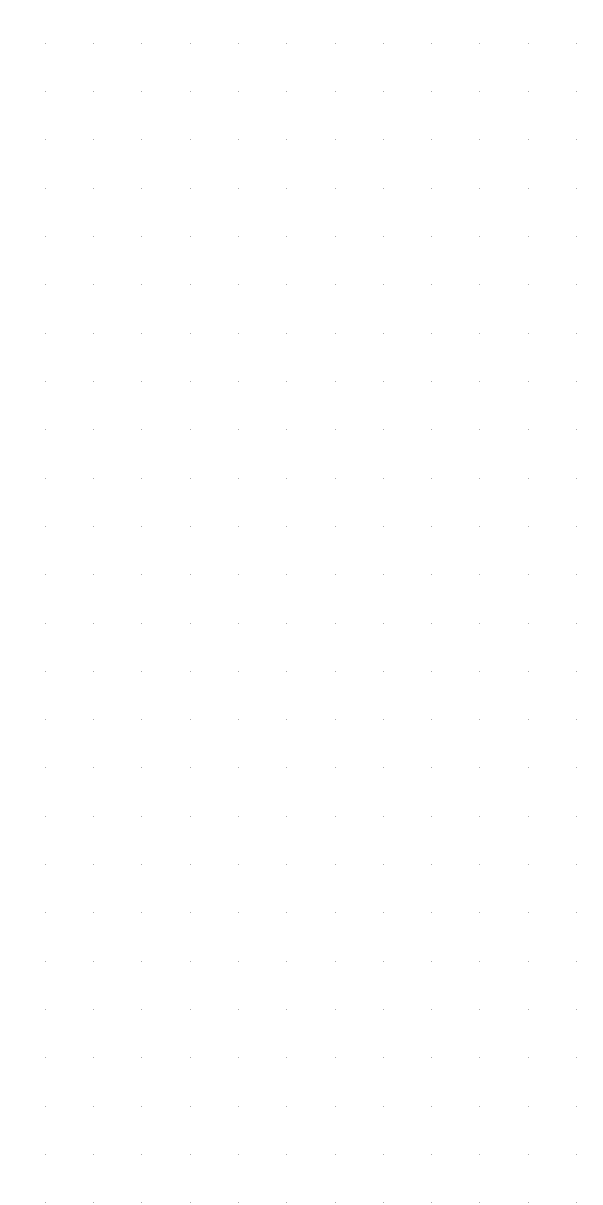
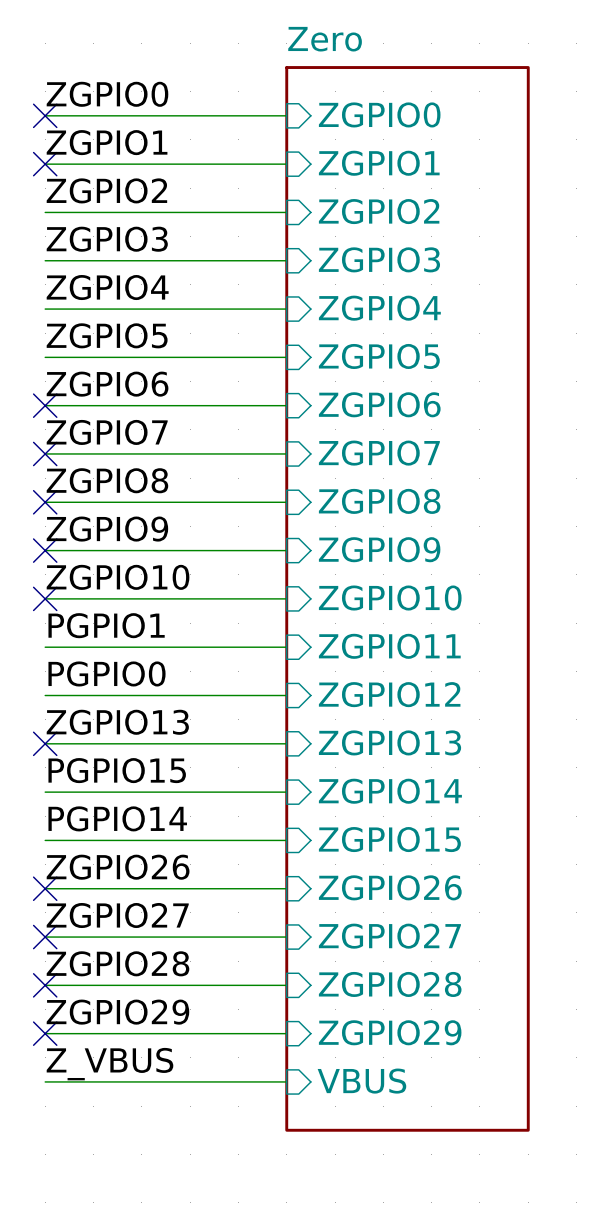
label: none -> ZGPIO0 (107, 94)
sheet pin: none -> ZGPIO0 (379, 114)
wire: none -> (45, 115) (286, 115)
no-connect mark: none -> (45, 115)
label: none -> ZGPIO1 (107, 142)
sheet pin: none -> ZGPIO1 (379, 163)
wire: none -> (45, 164) (286, 164)
no-connect mark: none -> (45, 164)
label: none -> ZGPIO2 (106, 190)
sheet pin: none -> ZGPIO2 (379, 211)
wire: none -> (45, 212) (286, 212)
label: none -> ZGPIO3 (107, 239)
sheet pin: none -> ZGPIO3 (379, 259)
wire: none -> (45, 260) (286, 260)
label: none -> ZGPIO4 (107, 287)
sheet pin: none -> ZGPIO4 (379, 308)
wire: none -> (45, 309) (286, 309)
label: none -> ZGPIO5 (107, 335)
sheet pin: none -> ZGPIO5 (379, 356)
wire: none -> (45, 357) (286, 357)
label: none -> ZGPIO6 (107, 384)
sheet pin: none -> ZGPIO6 (379, 404)
wire: none -> (45, 405) (286, 405)
no-connect mark: none -> (45, 405)
label: none -> ZGPIO7 (107, 432)
wire: none -> (45, 453) (286, 453)
no-connect mark: none -> (45, 453)
sheet pin: none -> ZGPIO7 (379, 453)
label: none -> ZGPIO8 (107, 480)
sheet pin: none -> ZGPIO8 (379, 501)
wire: none -> (45, 502) (286, 502)
no-connect mark: none -> (45, 502)
label: none -> ZGPIO9 (107, 529)
sheet pin: none -> ZGPIO9 (379, 549)
wire: none -> (45, 550) (286, 550)
no-connect mark: none -> (45, 550)
label: none -> ZGPIO10 (118, 577)
wire: none -> (45, 598) (286, 598)
no-connect mark: none -> (45, 598)
sheet pin: none -> ZGPIO10 (390, 598)
sheet Zero: none -> (407, 598)
label: none -> PGPIO1 (106, 625)
sheet pin: none -> ZGPIO11 (389, 646)
wire: none -> (45, 647) (286, 647)
label: none -> PGPIO0 (107, 673)
sheet pin: none -> ZGPIO12 (389, 694)
wire: none -> (45, 695) (286, 695)
label: none -> ZGPIO13 (117, 722)
sheet pin: none -> ZGPIO13 (390, 742)
wire: none -> (45, 743) (286, 743)
no-connect mark: none -> (45, 743)
label: none -> PGPIO15 (117, 770)
sheet pin: none -> ZGPIO14 (390, 791)
wire: none -> (45, 792) (286, 792)
label: none -> PGPIO14 (117, 818)
sheet pin: none -> ZGPIO15 (389, 839)
wire: none -> (45, 840) (286, 840)
label: none -> ZGPIO26 (118, 867)
sheet pin: none -> ZGPIO26 (390, 887)
wire: none -> (45, 888) (286, 888)
no-connect mark: none -> (45, 888)
label: none -> ZGPIO27 (117, 915)
sheet pin: none -> ZGPIO27 (389, 936)
wire: none -> (45, 937) (286, 937)
no-connect mark: none -> (45, 937)
label: none -> ZGPIO28 (117, 963)
sheet pin: none -> ZGPIO28 (390, 984)
wire: none -> (45, 985) (286, 985)
no-connect mark: none -> (45, 985)
label: none -> ZGPIO29 (117, 1012)
sheet pin: none -> ZGPIO29 (390, 1032)
wire: none -> (45, 1033) (286, 1033)
no-connect mark: none -> (45, 1033)
label: none -> Z_VBUS (109, 1064)
wire: none -> (45, 1081) (286, 1081)
sheet pin: none -> VBUS (361, 1081)

